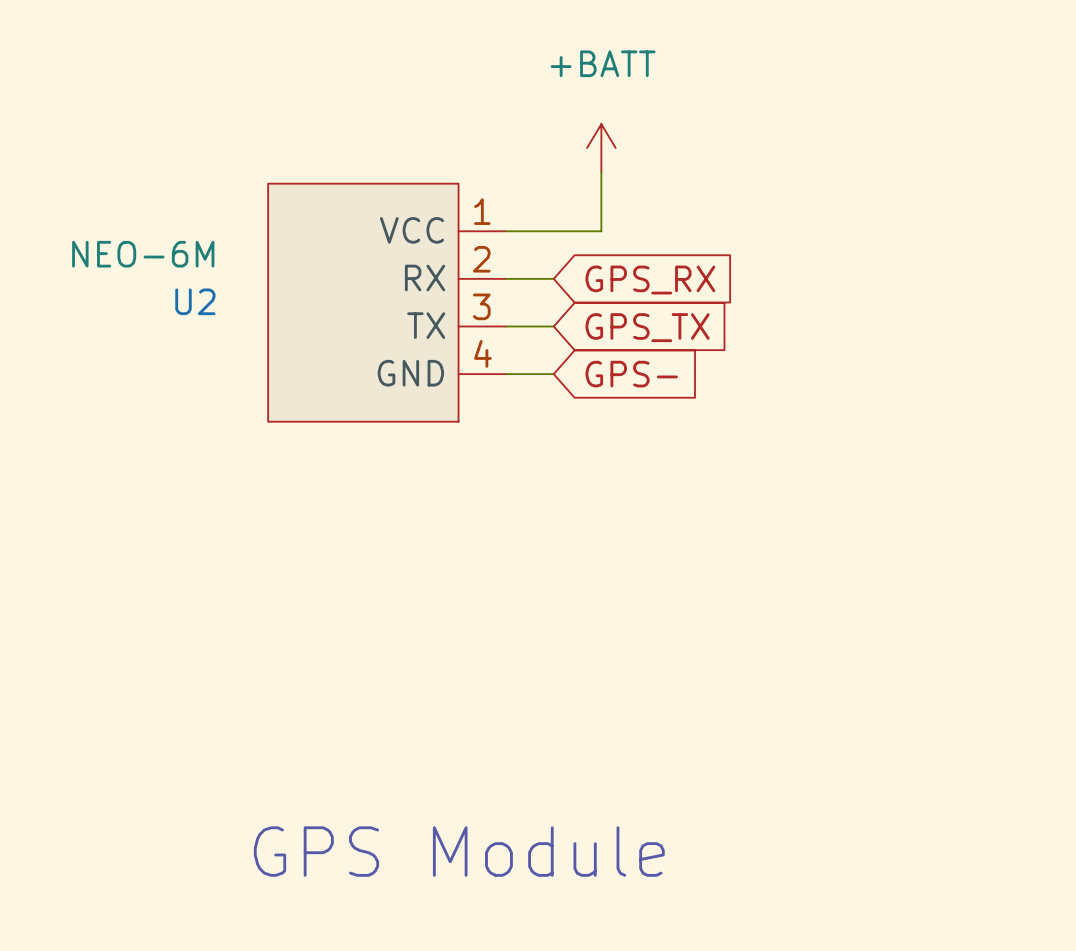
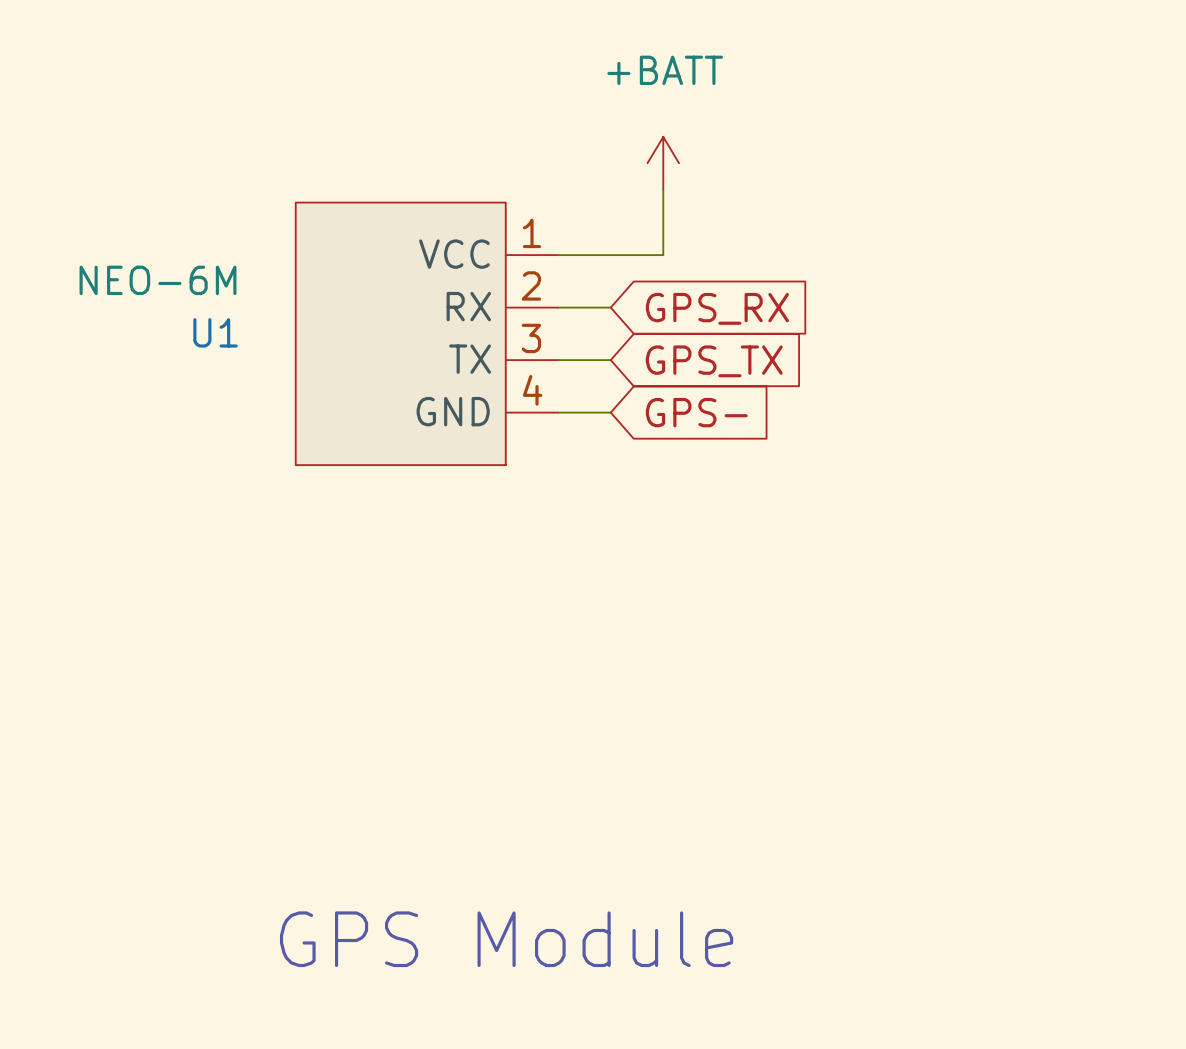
U2 name: U2 (195, 301) -> U1 (215, 332)

